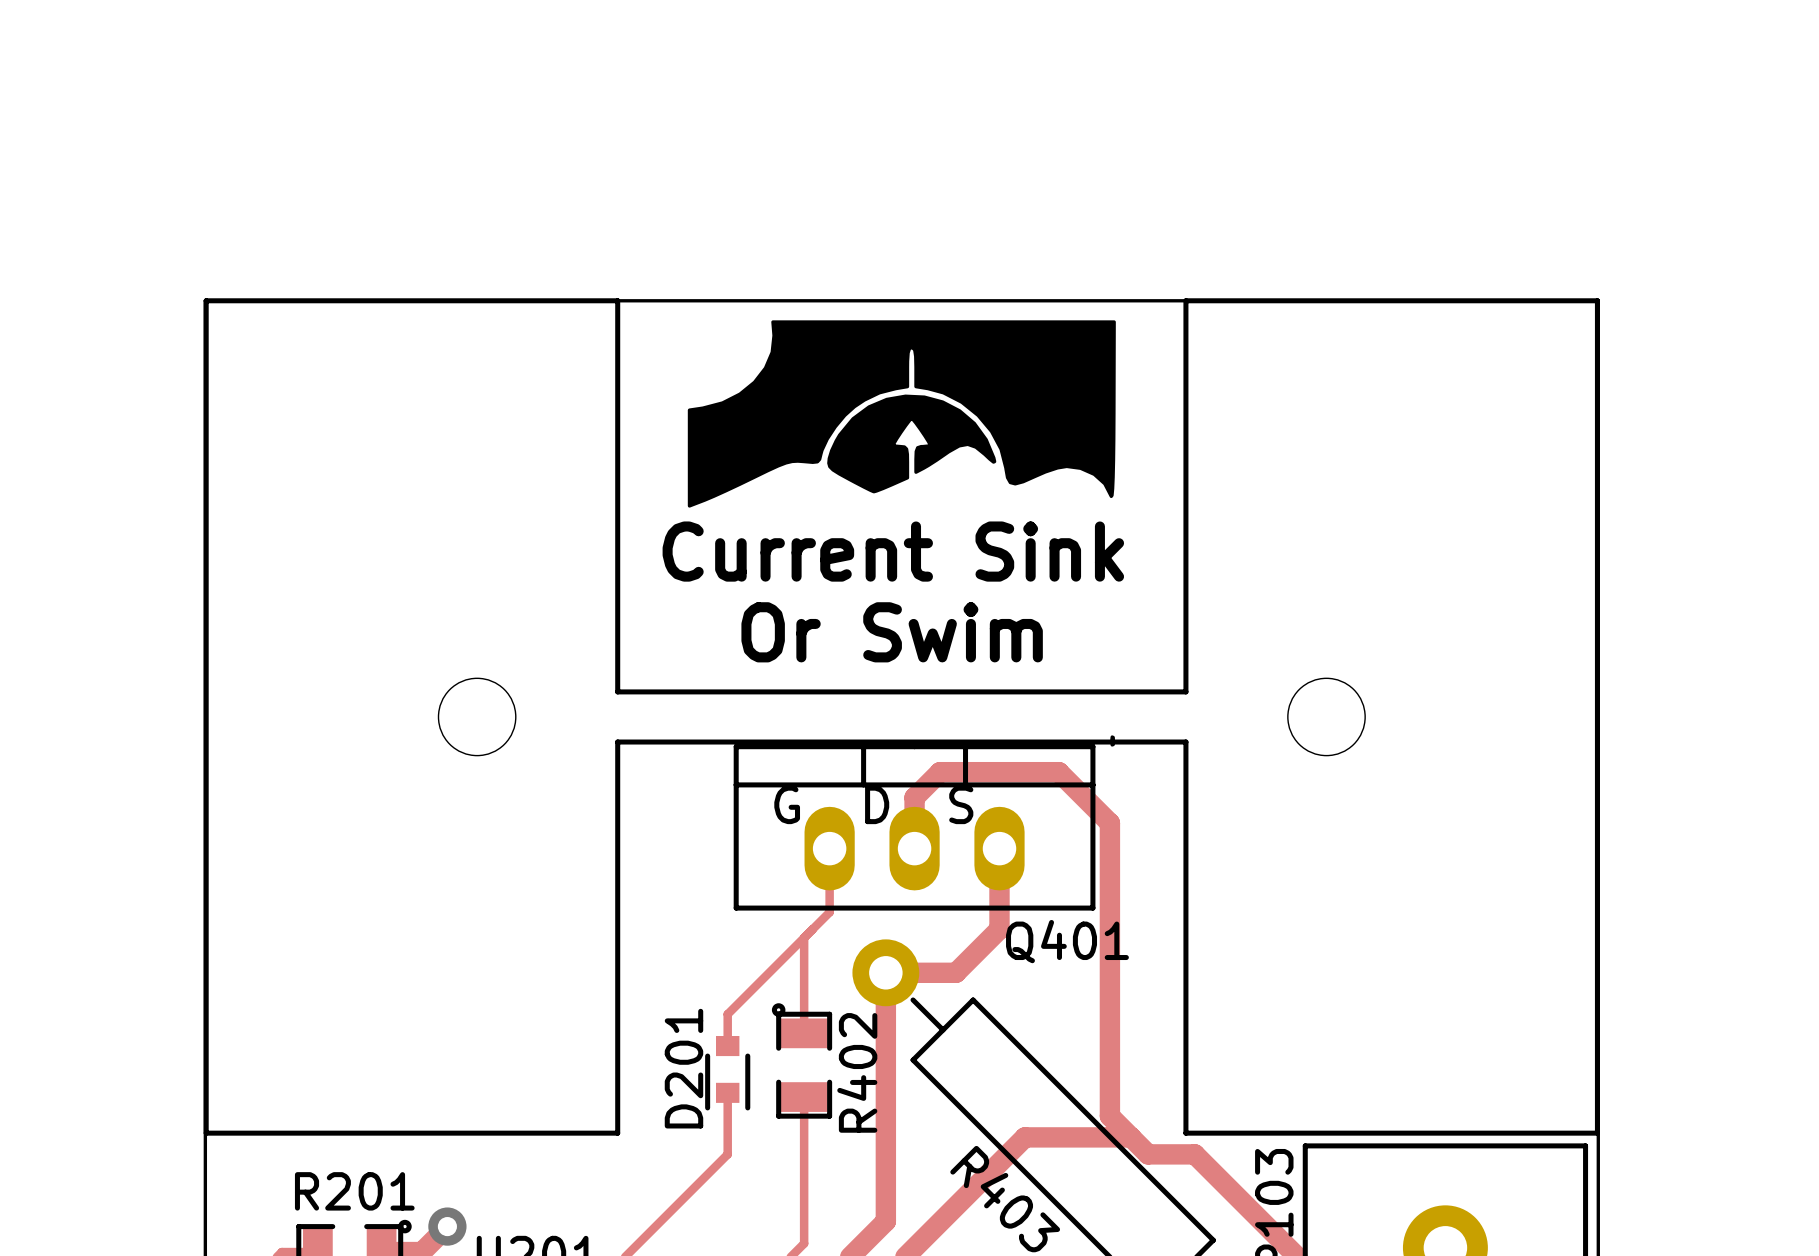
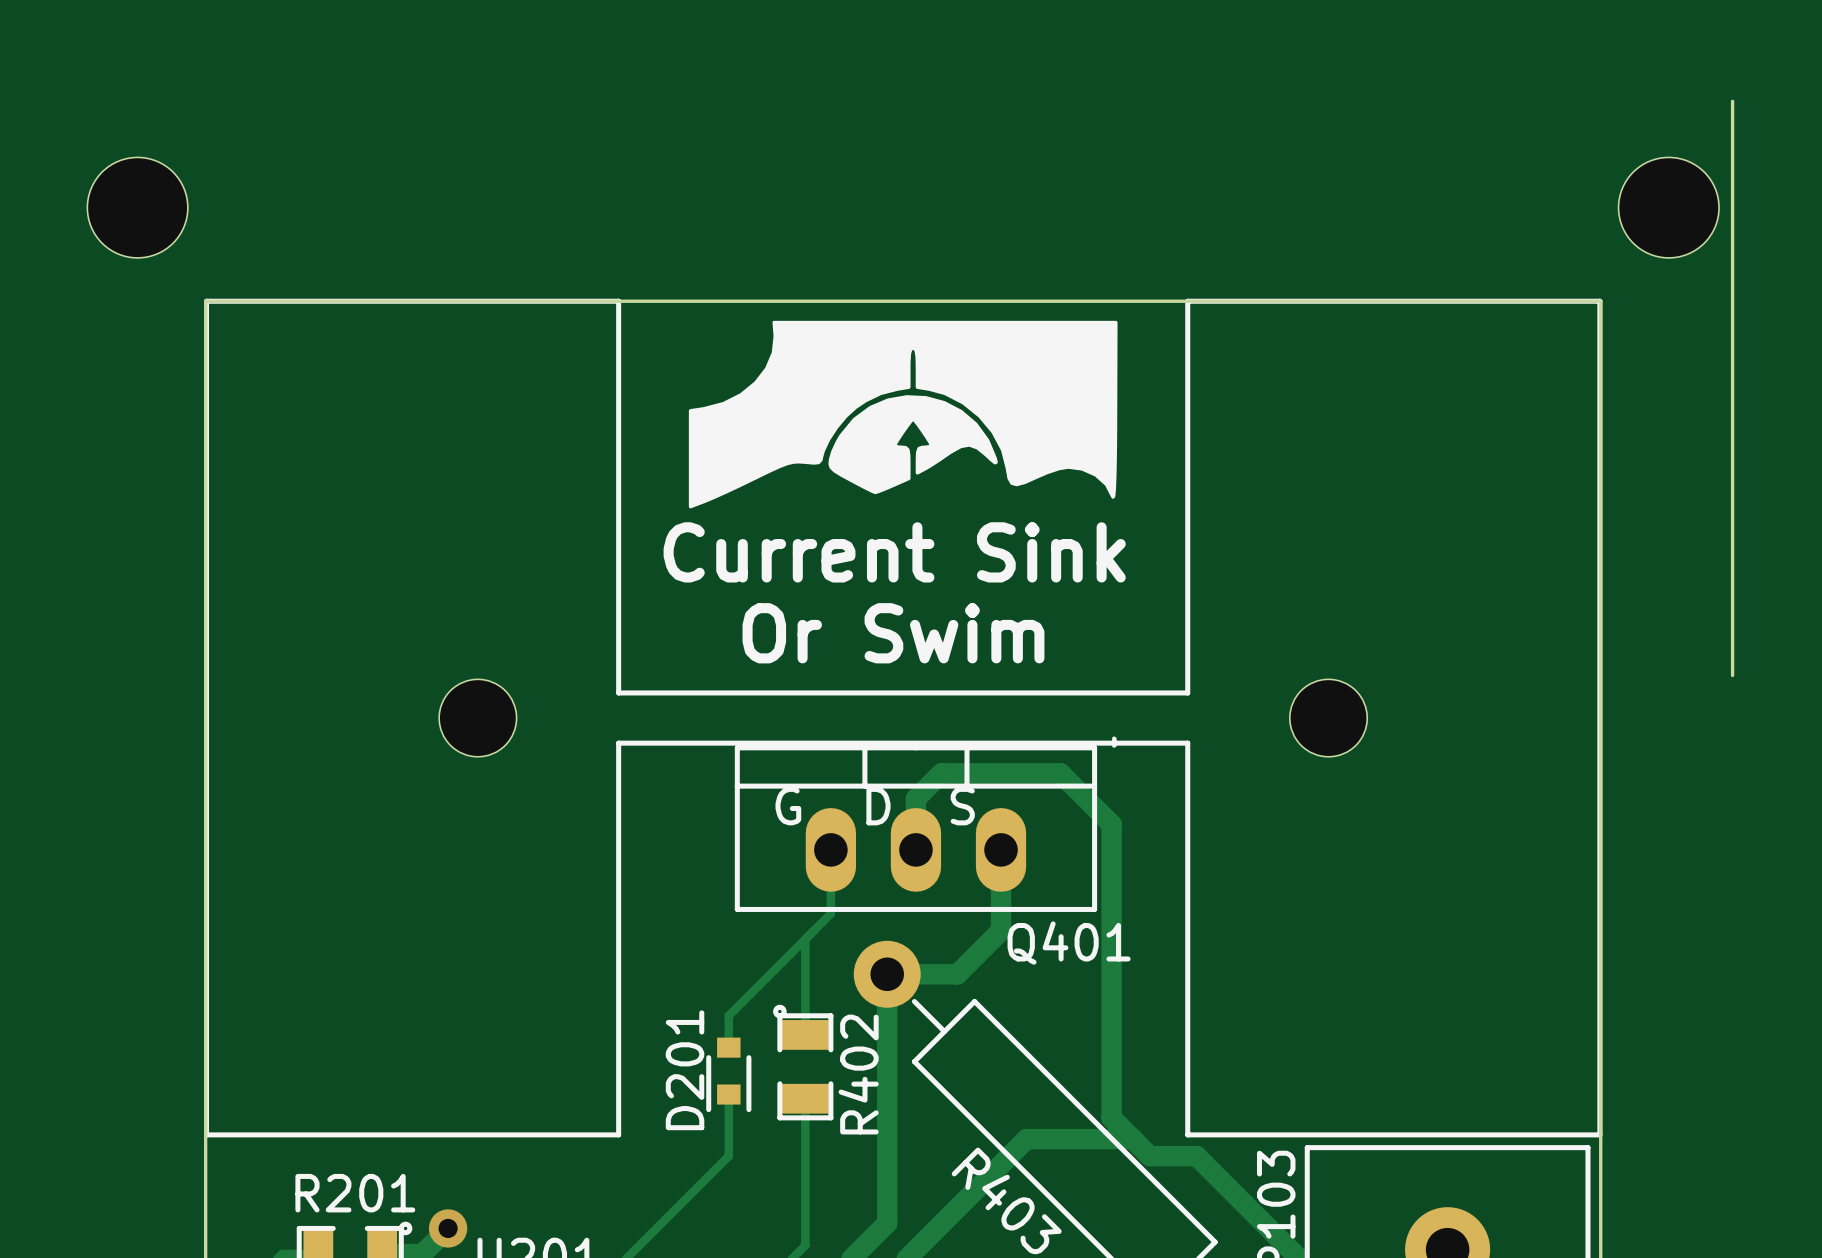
board edge: none -> (1732, 101) (1732, 675)
part: none -> (137, 207)
part: none -> (1668, 207)

